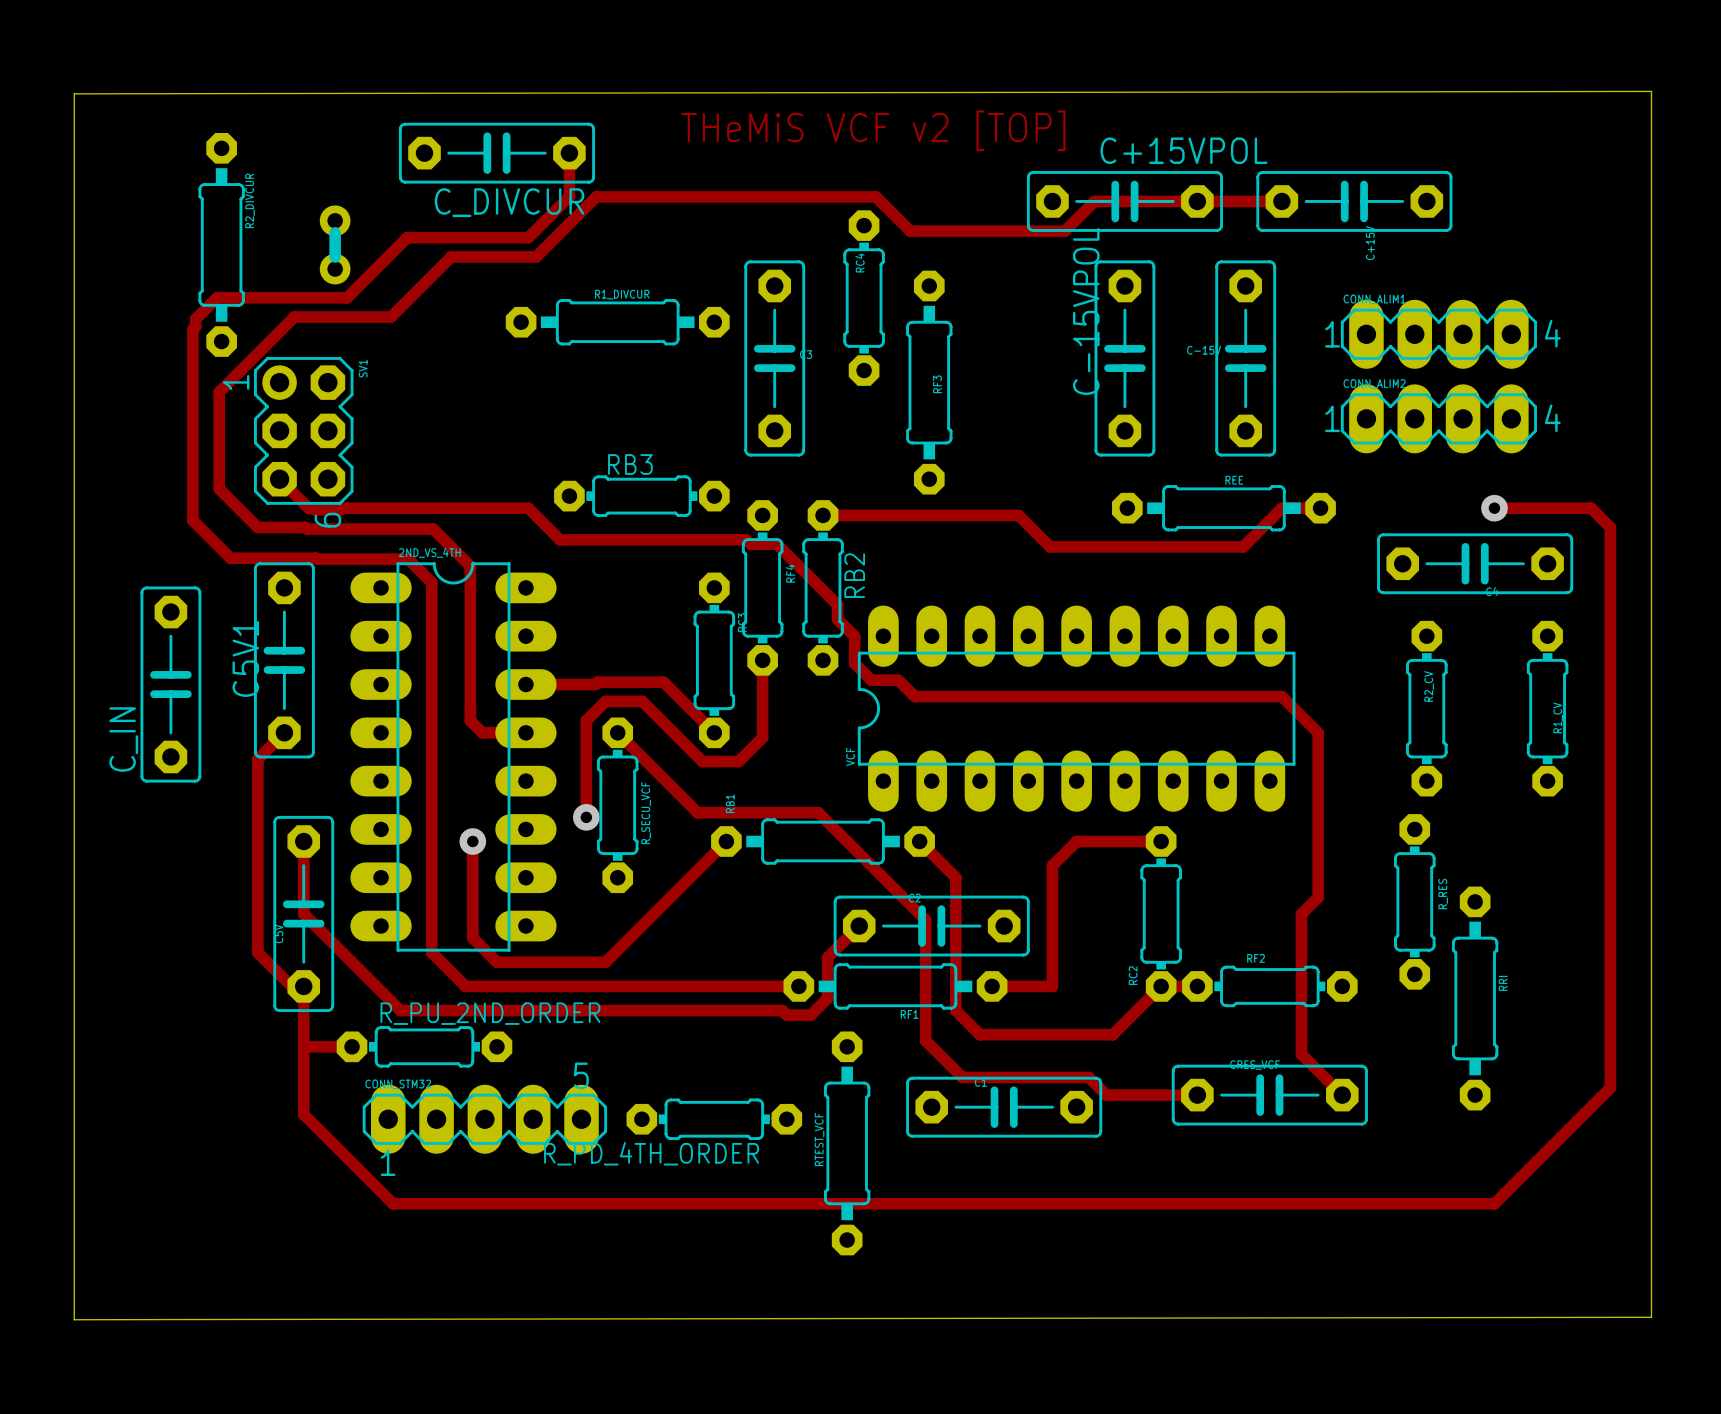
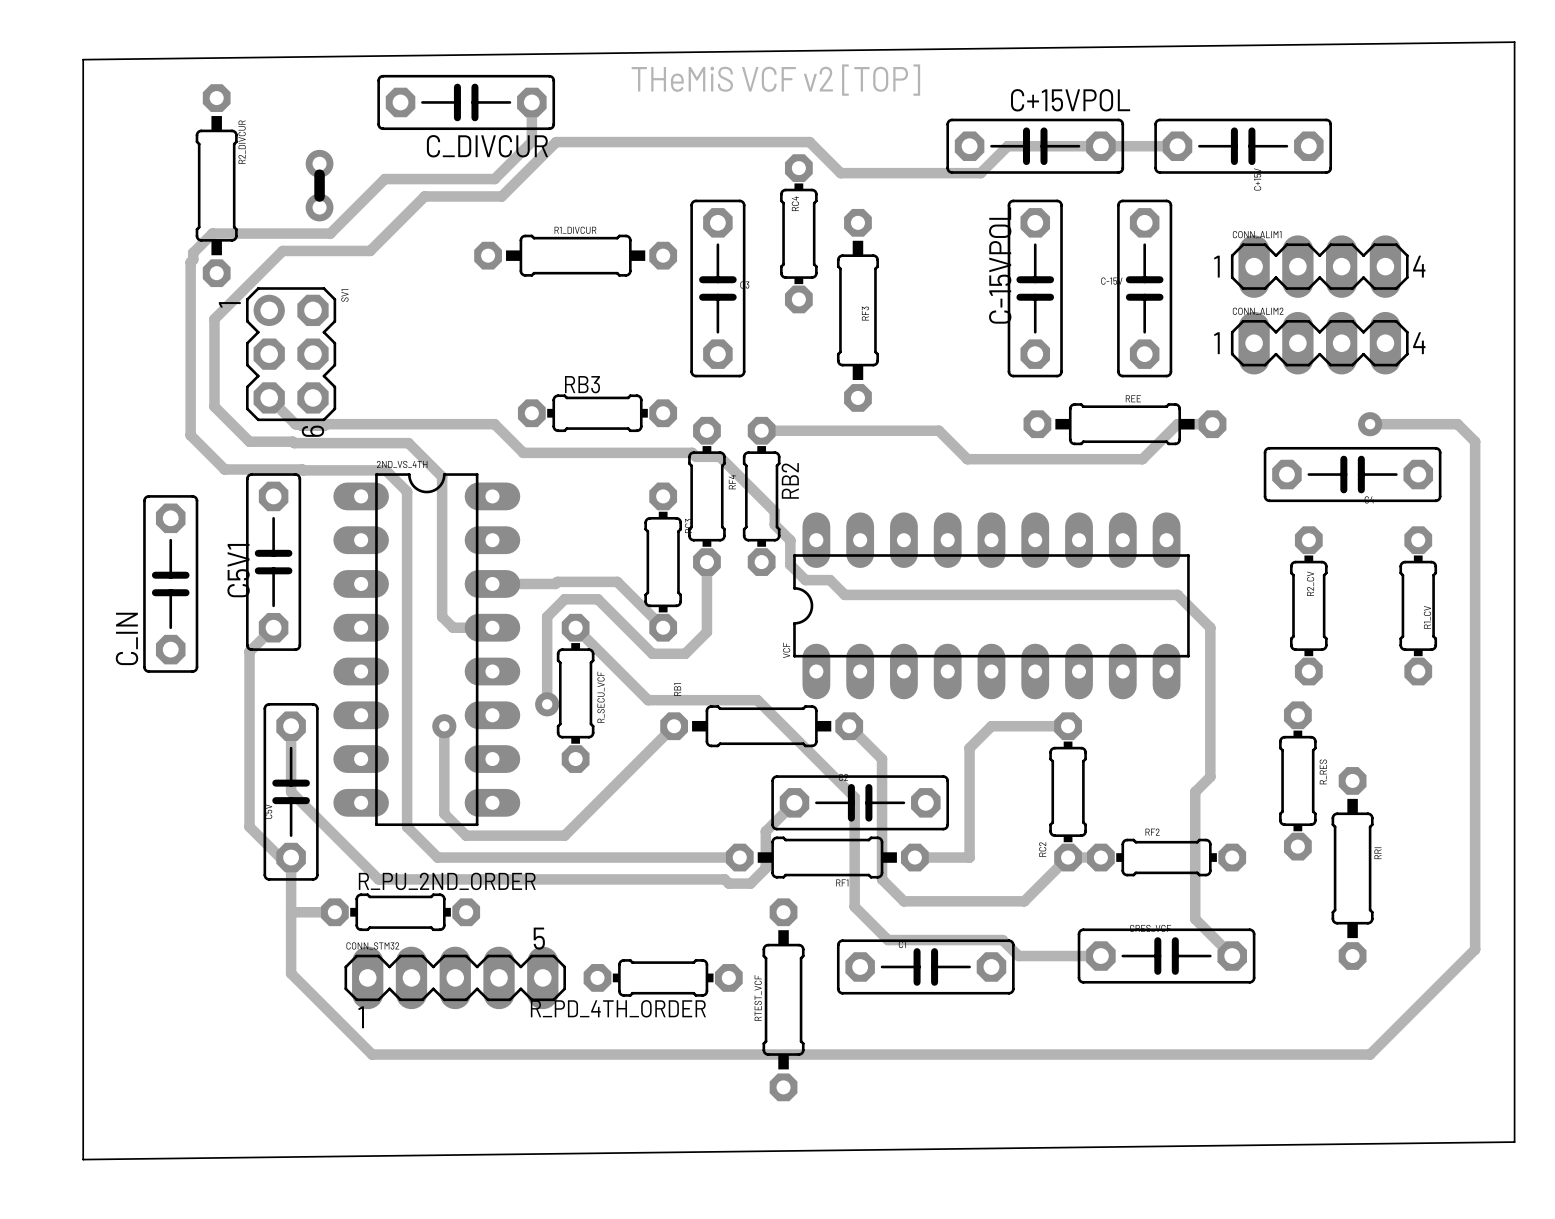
board edge: (74, 105) (74, 93) (1651, 91) (1651, 1317) (74, 1319) -> (83, 59) (1514, 42) (1514, 1142) (83, 1159)

